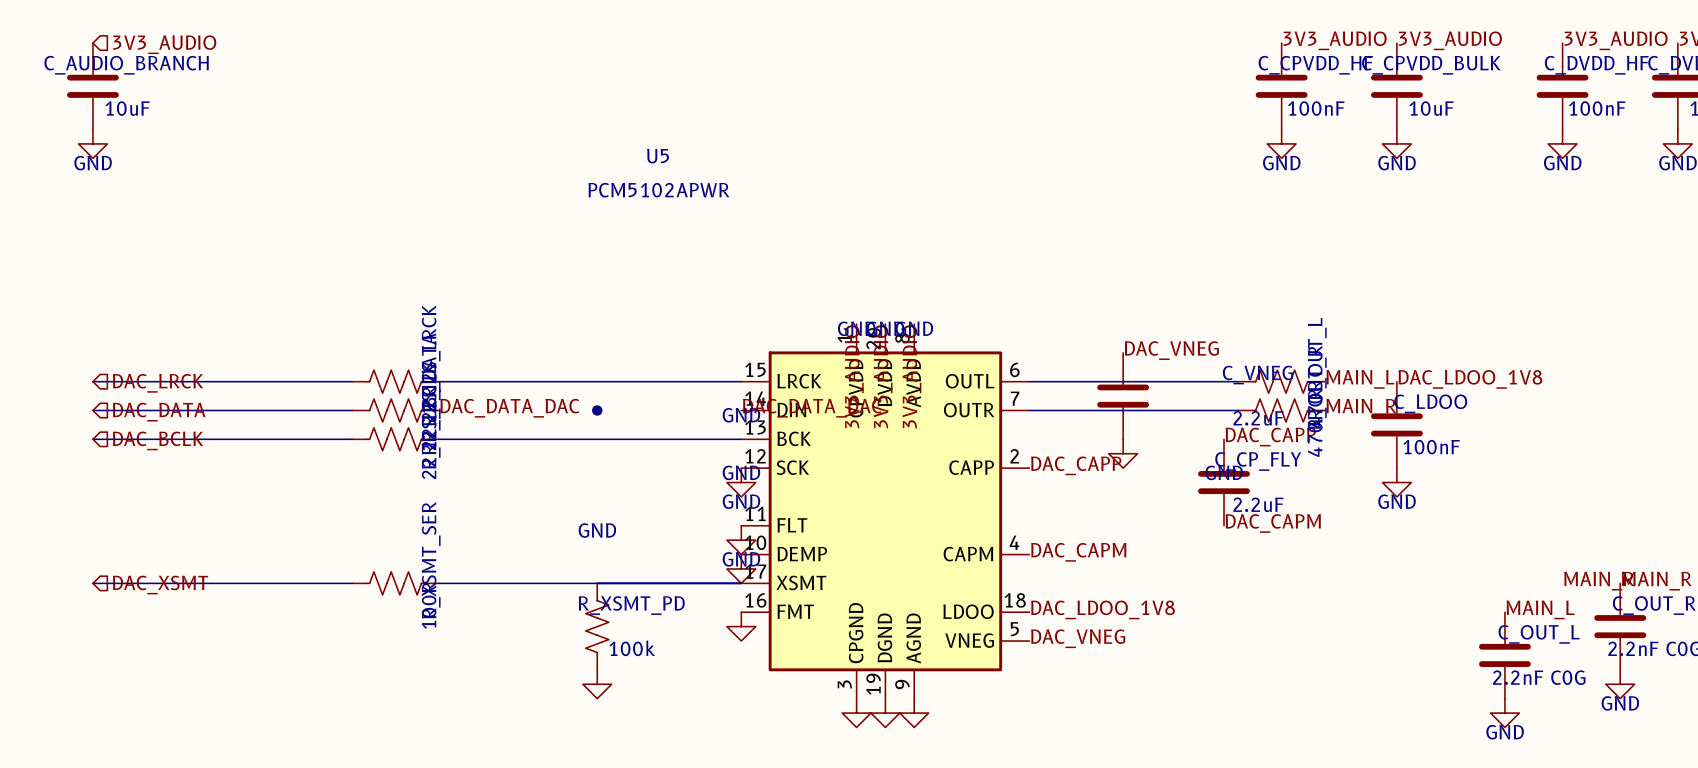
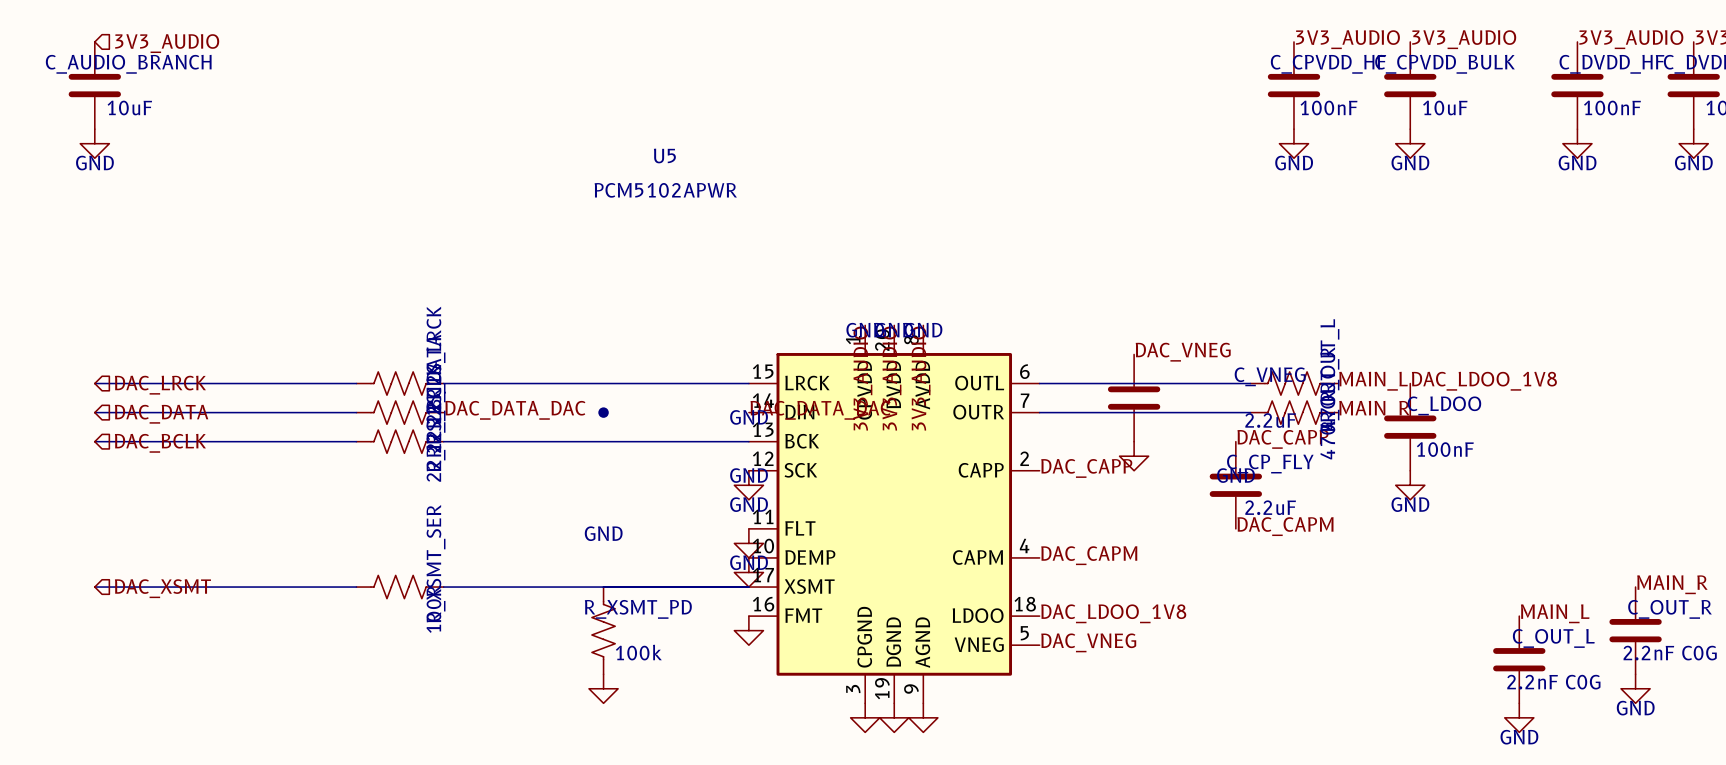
label: MAIN_R (1599, 581) -> none

